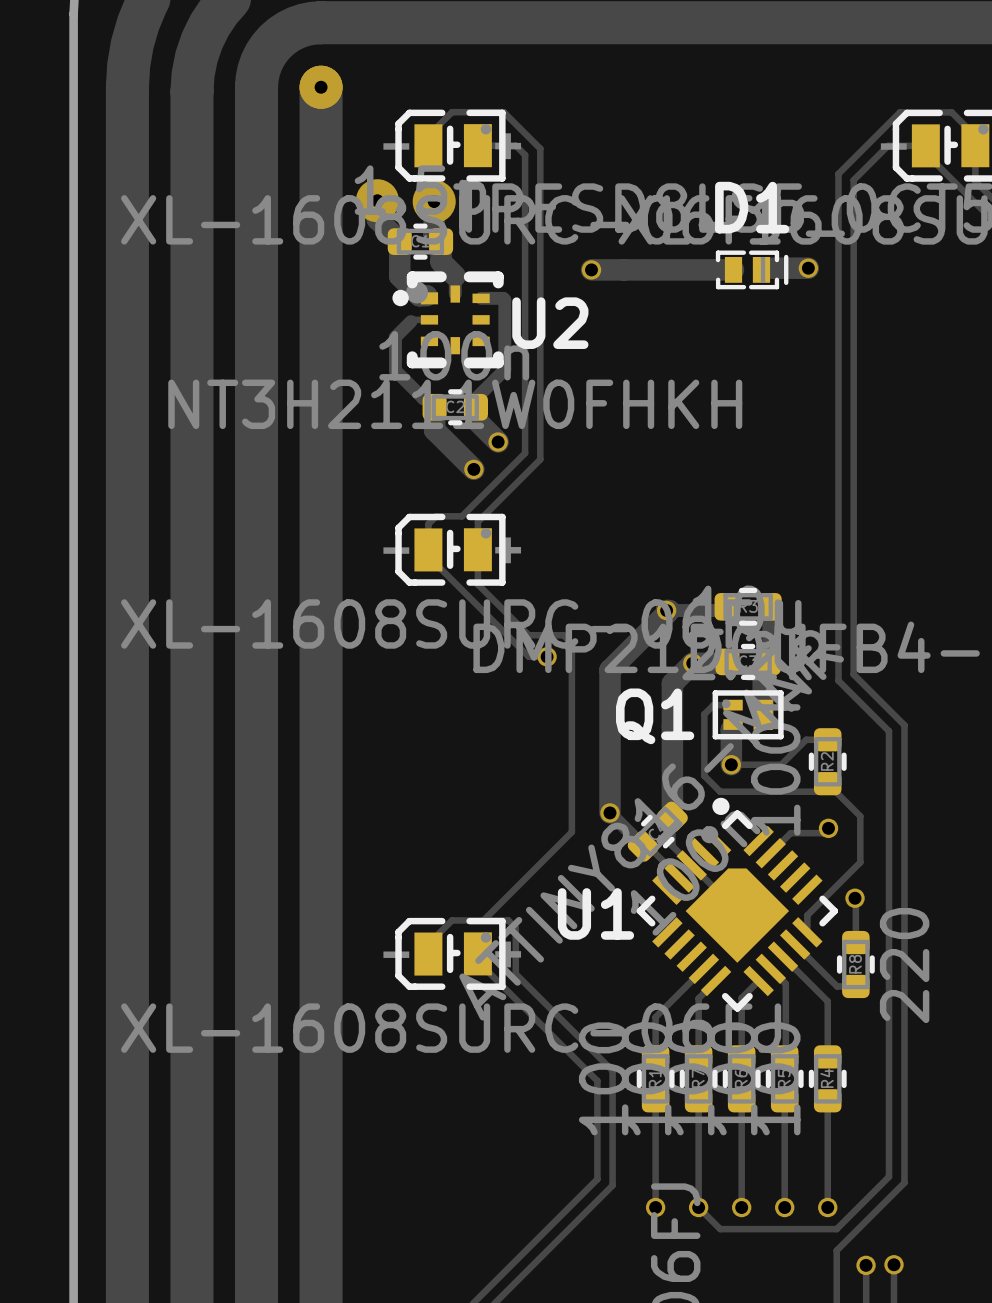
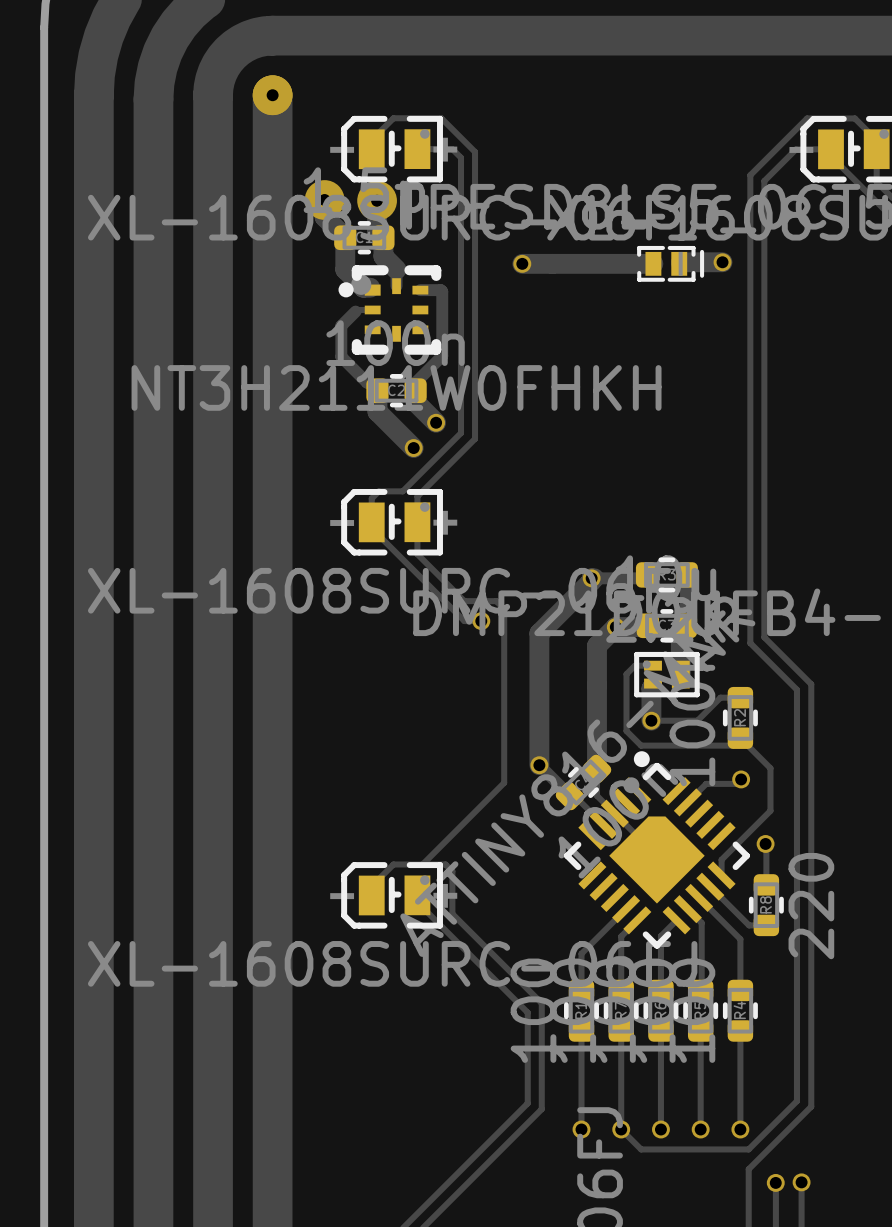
D1 name: D1 (752, 207) -> none
text: U2 (550, 323) -> none
text: Q1 (655, 716) -> none
text: U1 (595, 913) -> none

